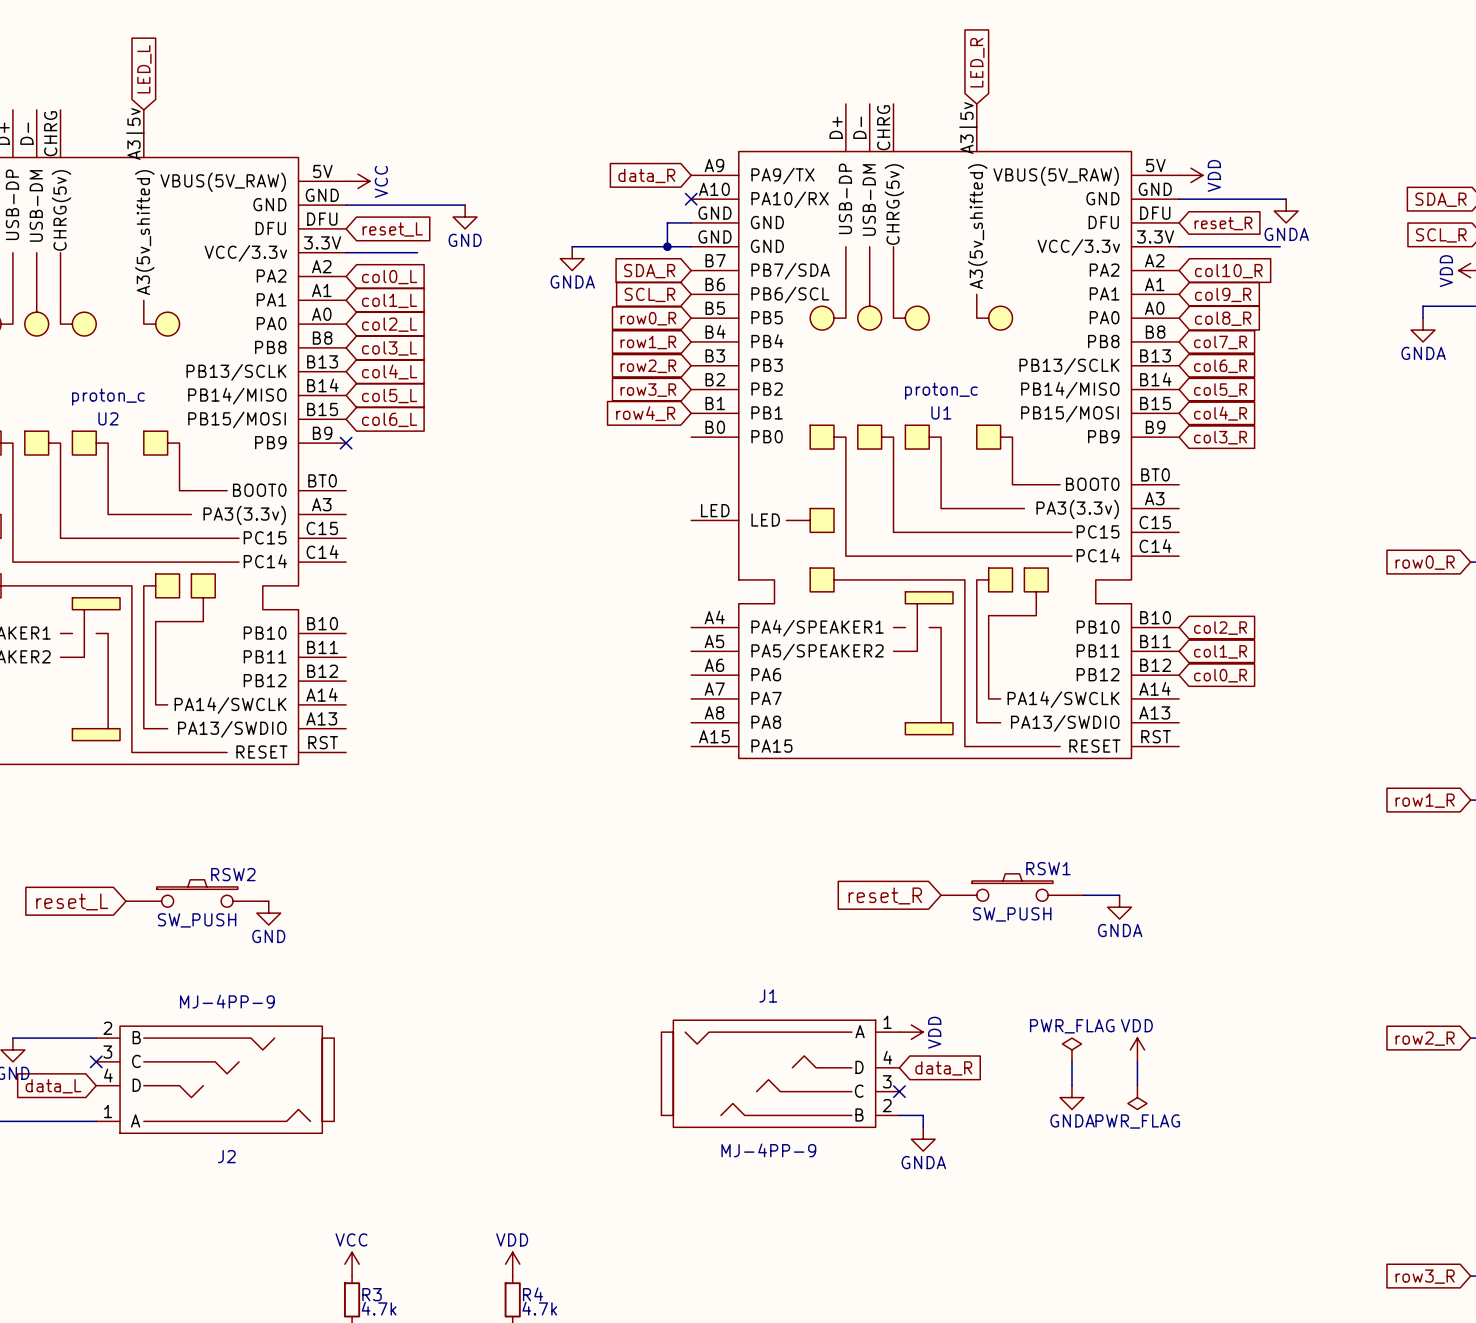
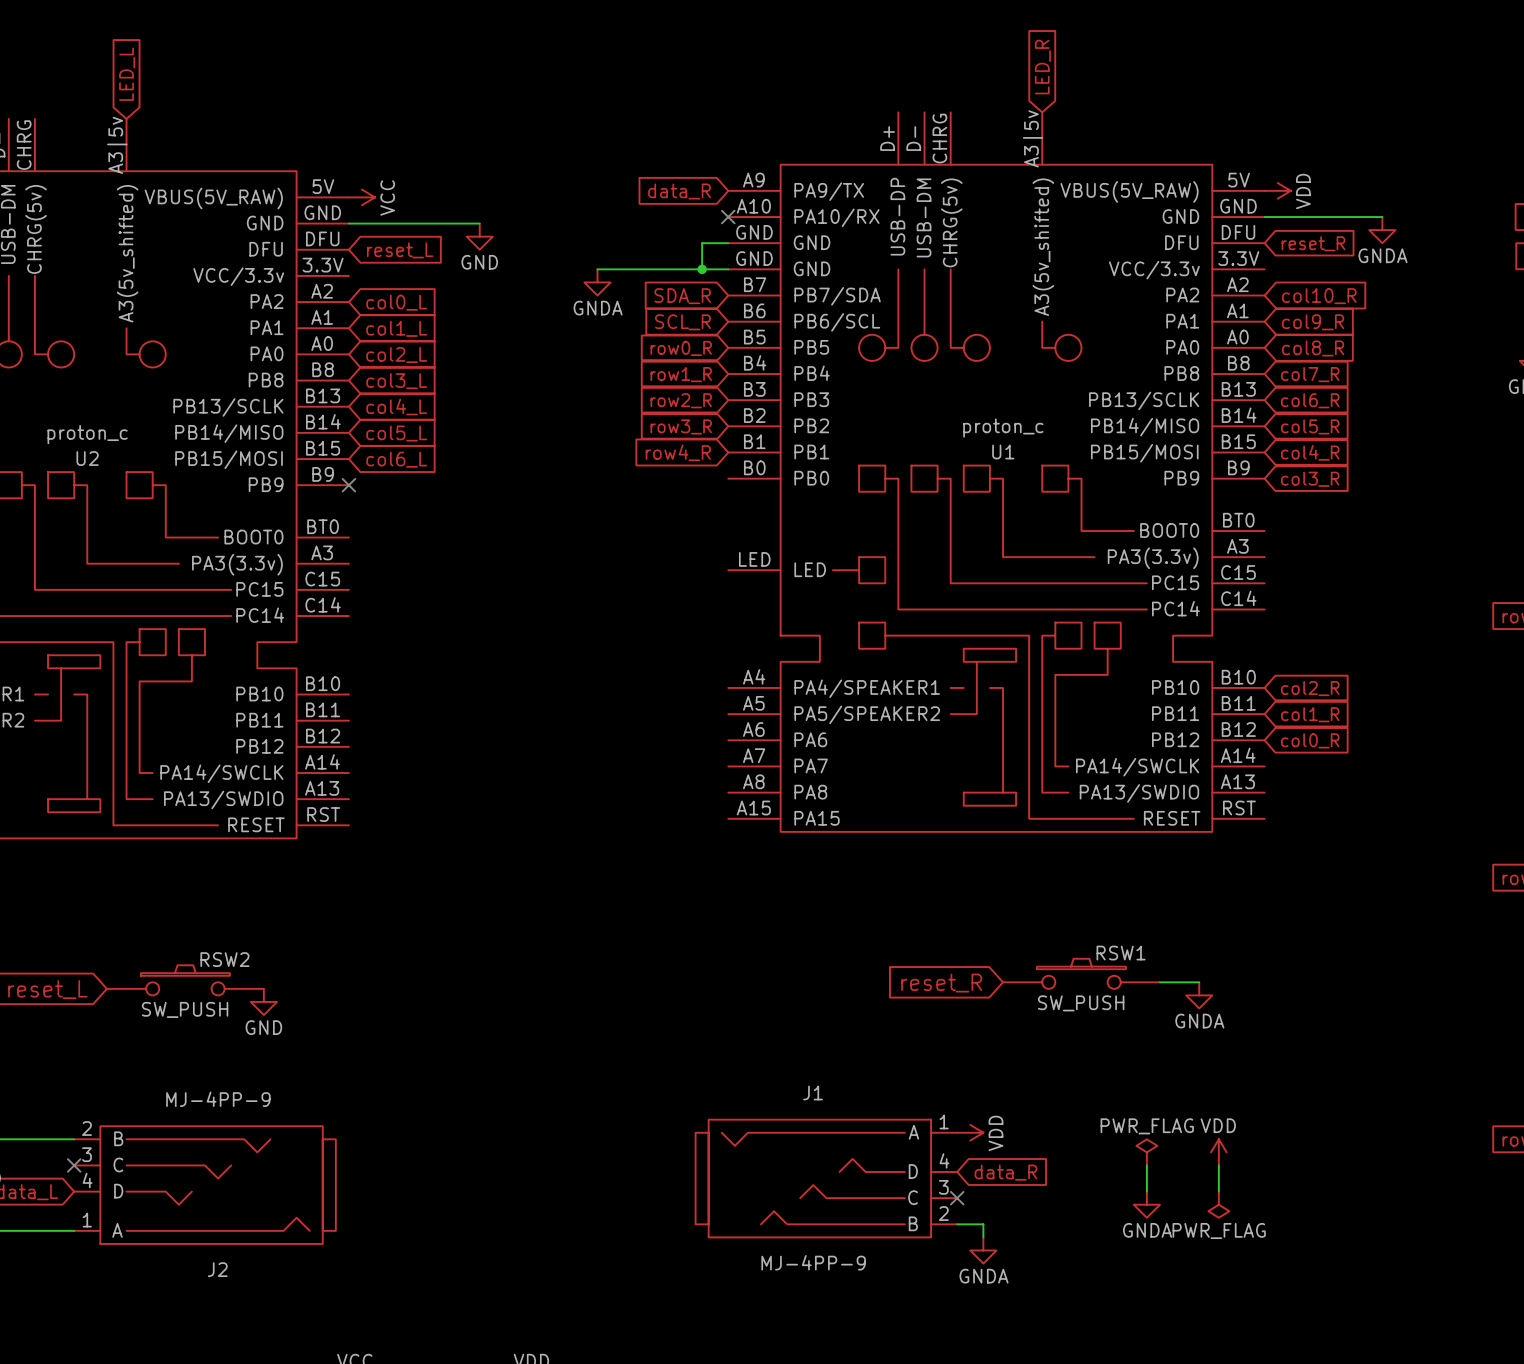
wire: (1179, 246) (1280, 246) -> none
wire: (346, 252) (417, 252) -> none

